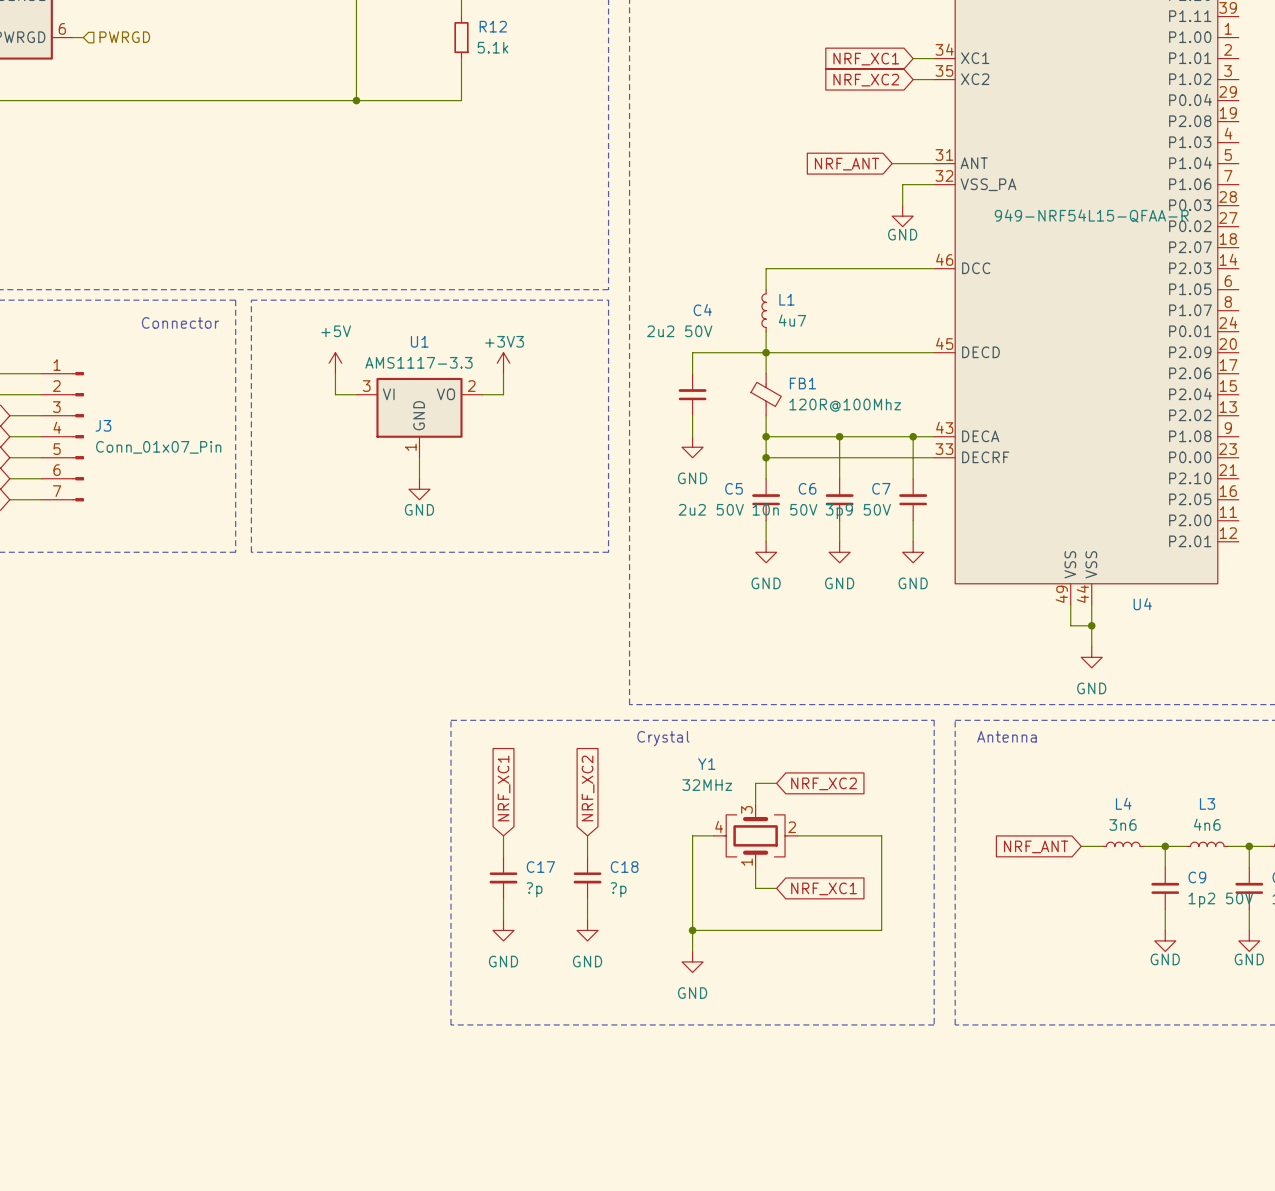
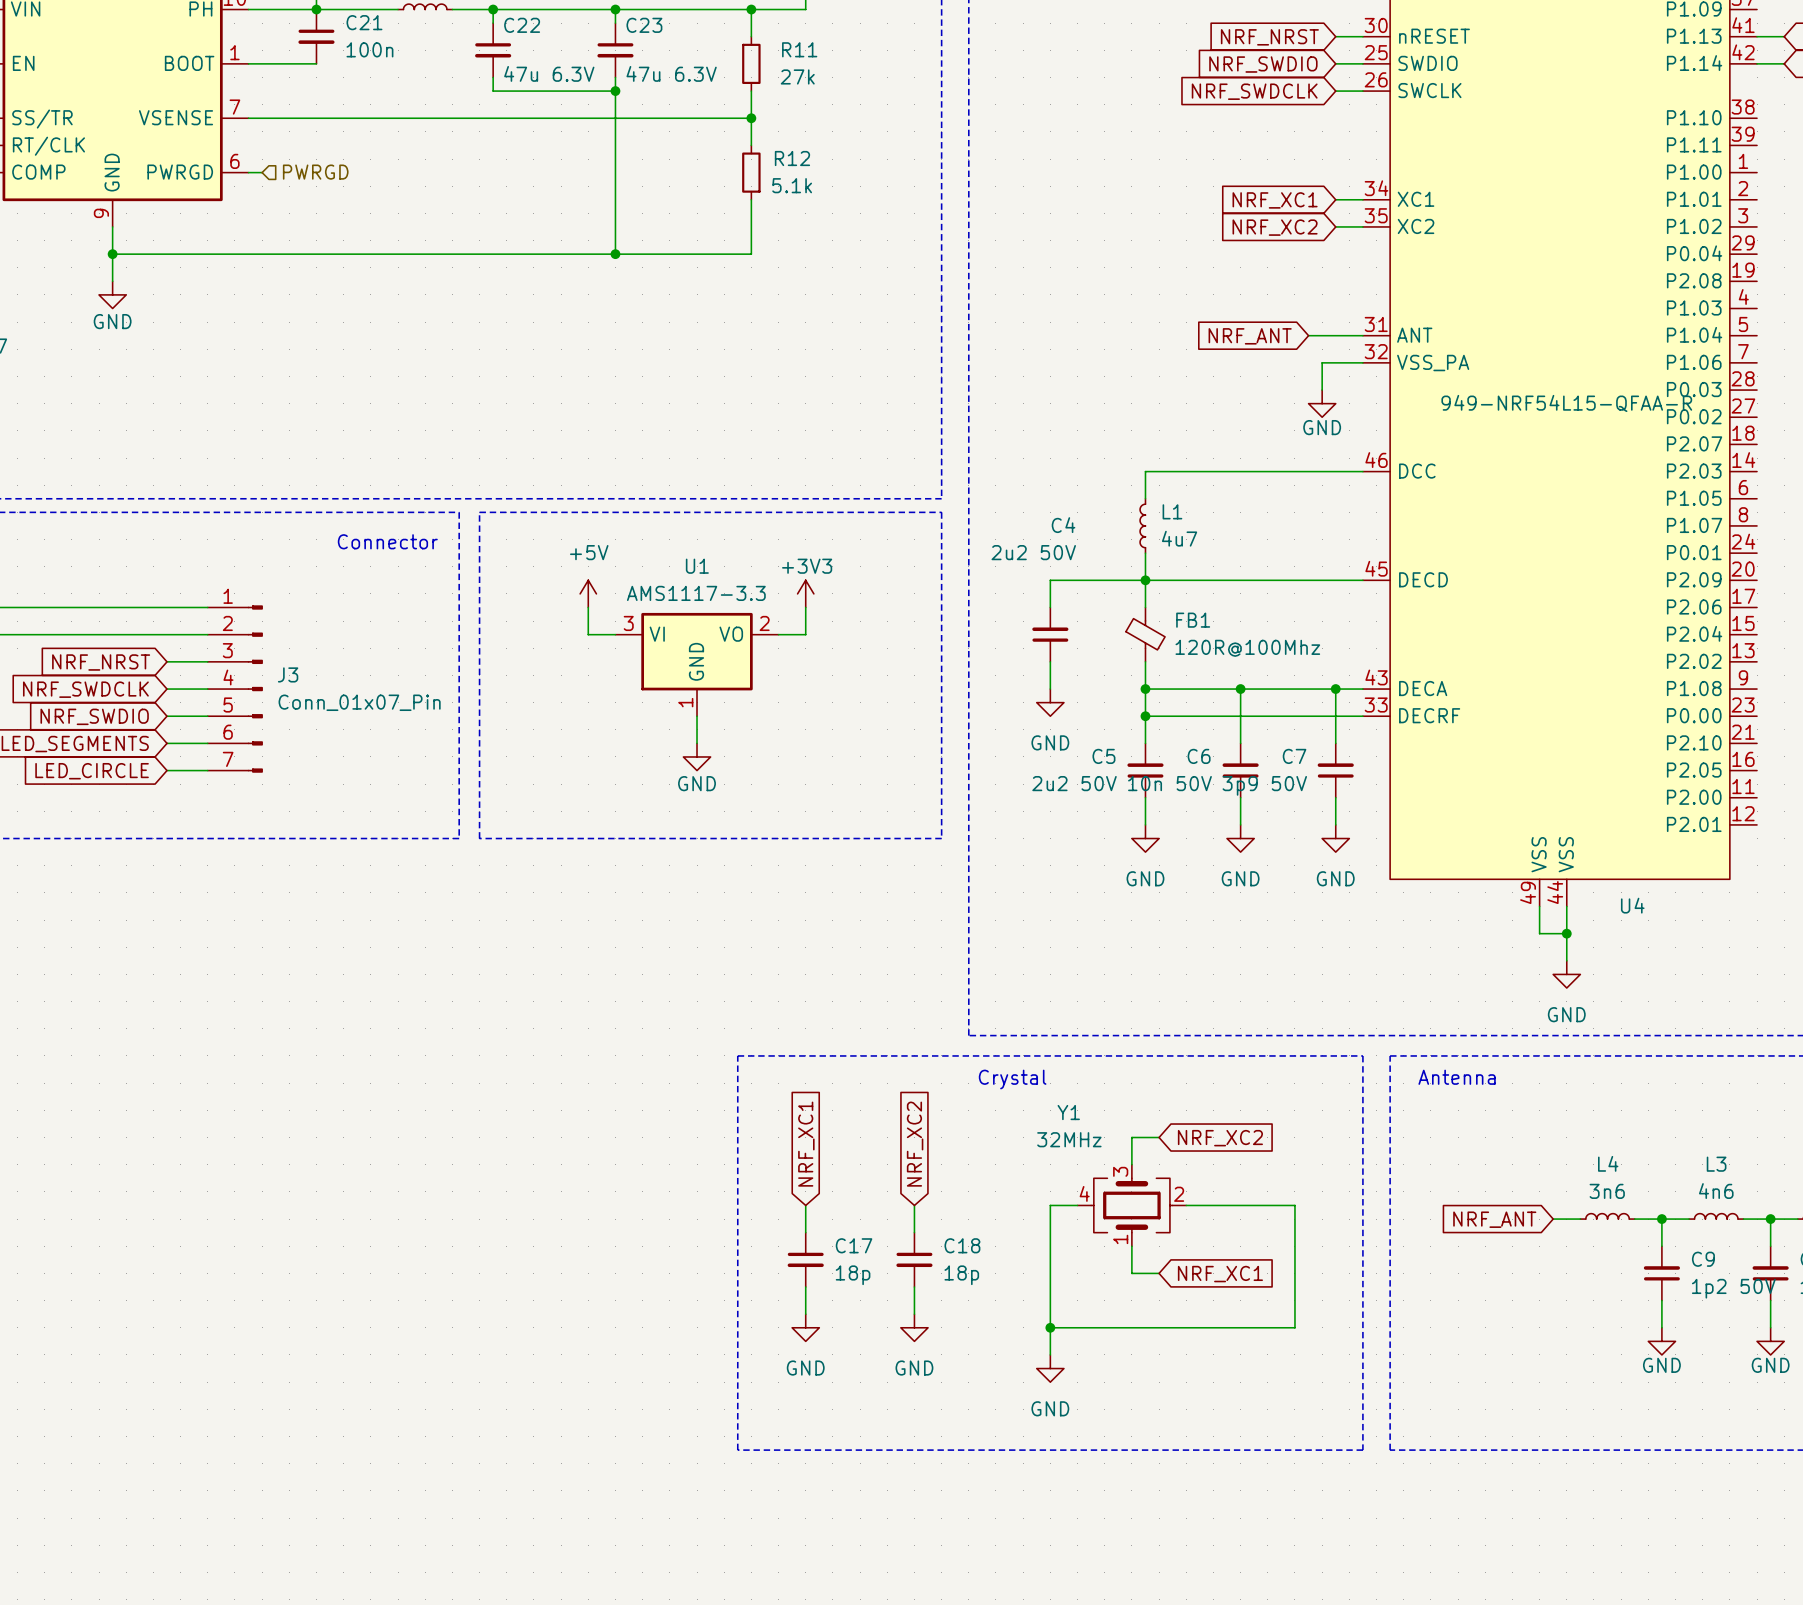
C17 value: ?p (534, 889) -> 18p (853, 1275)
C18 value: ?p (618, 889) -> 18p (961, 1275)

